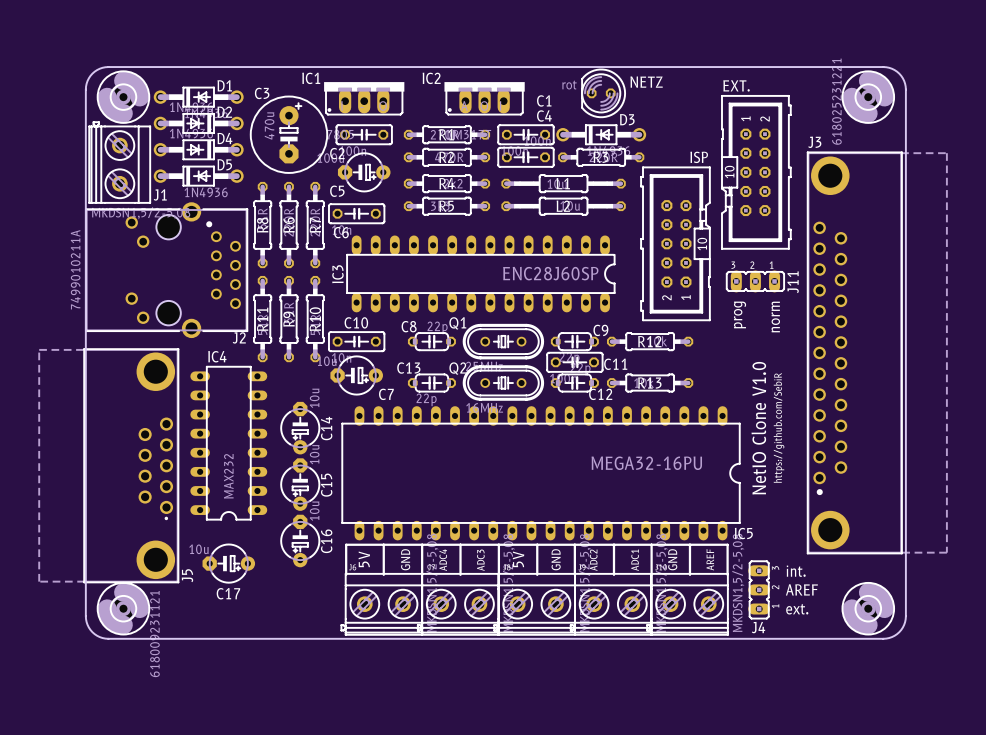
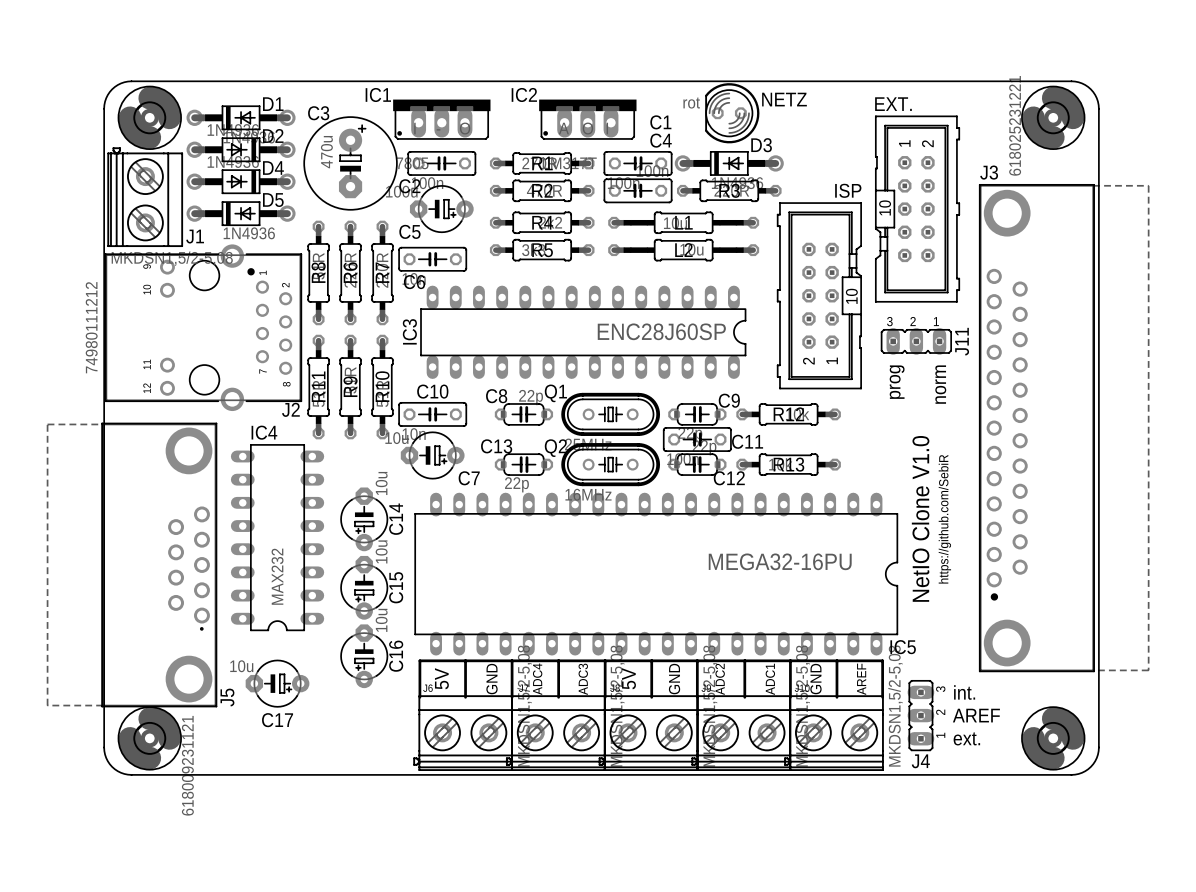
J2 footprint: [85, 202, 249, 339] -> [104, 244, 303, 412]
J2 value: 7499010211A (75, 269) -> 74980111212 (91, 327)

